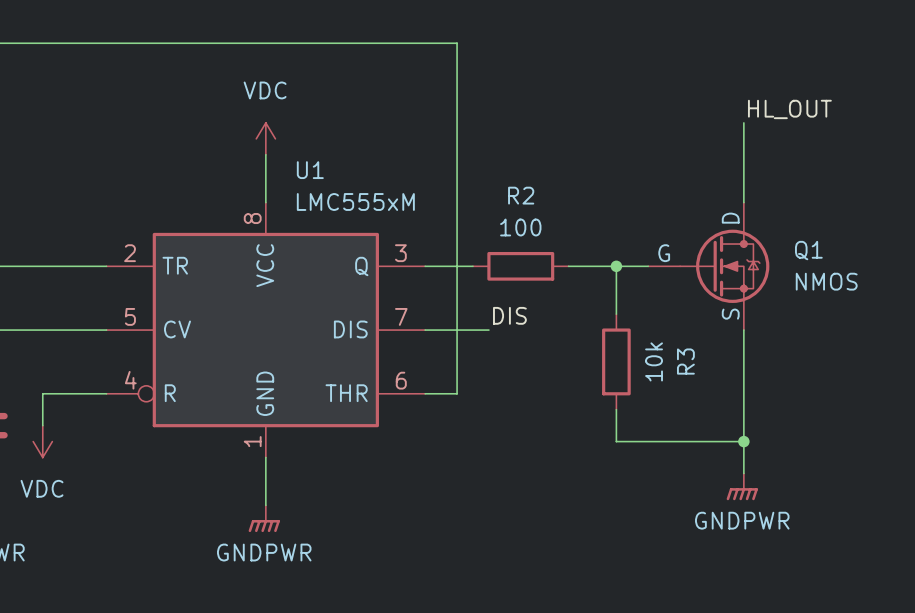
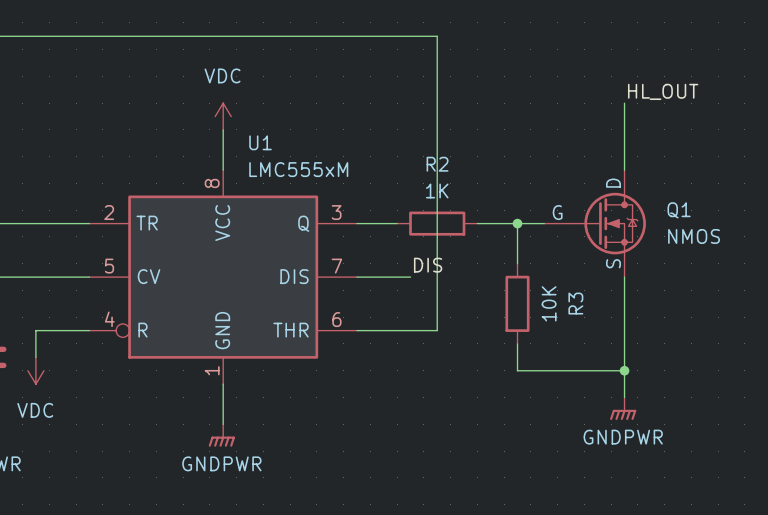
wire: (457, 43) (457, 393) -> (383, 36) (437, 36) (437, 330) (383, 330)
R2 value: 100 (520, 227) -> 1K (437, 190)
R3 value: 10k (654, 361) -> 10K (549, 303)

